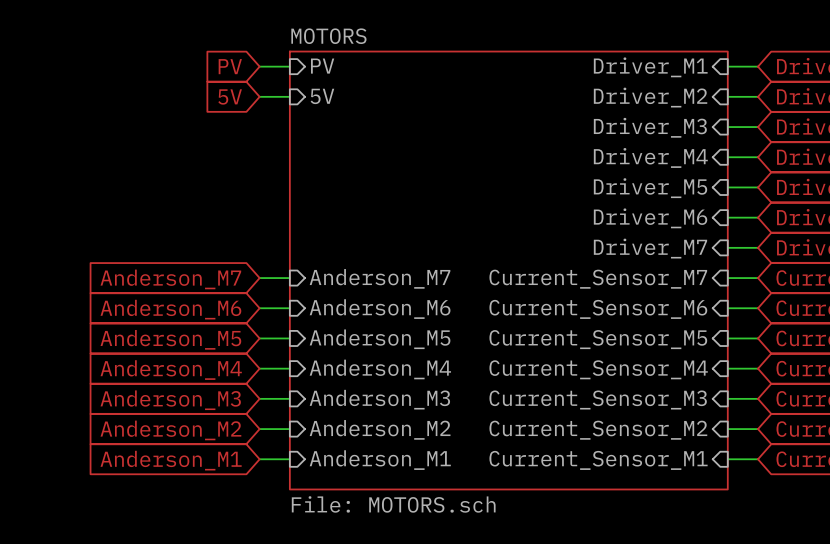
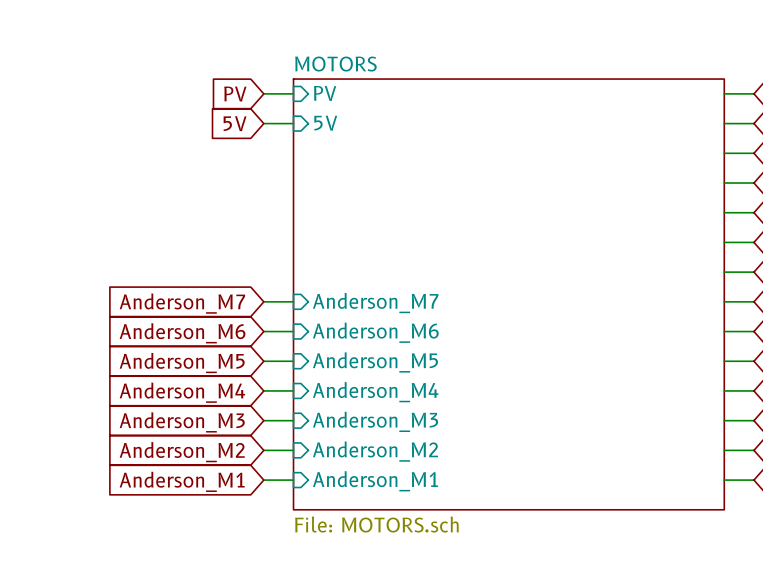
sheet pin: Driver_M1 (650, 67) -> none
sheet pin: Driver_M2 (650, 97) -> none
sheet pin: Driver_M3 (650, 127) -> none
sheet pin: Driver_M4 (650, 157) -> none
sheet pin: Driver_M5 (650, 188) -> none
sheet pin: Driver_M6 (650, 218) -> none
sheet pin: Driver_M7 (650, 248) -> none
sheet pin: Current_Sensor_M7 (598, 279) -> none
sheet pin: Current_Sensor_M6 (598, 309) -> none
sheet pin: Current_Sensor_M5 (598, 339) -> none
sheet pin: Current_Sensor_M4 (598, 369) -> none
sheet pin: Current_Sensor_M3 (598, 400) -> none
sheet pin: Current_Sensor_M2 (598, 430) -> none
sheet pin: Current_Sensor_M1 (598, 460) -> none

